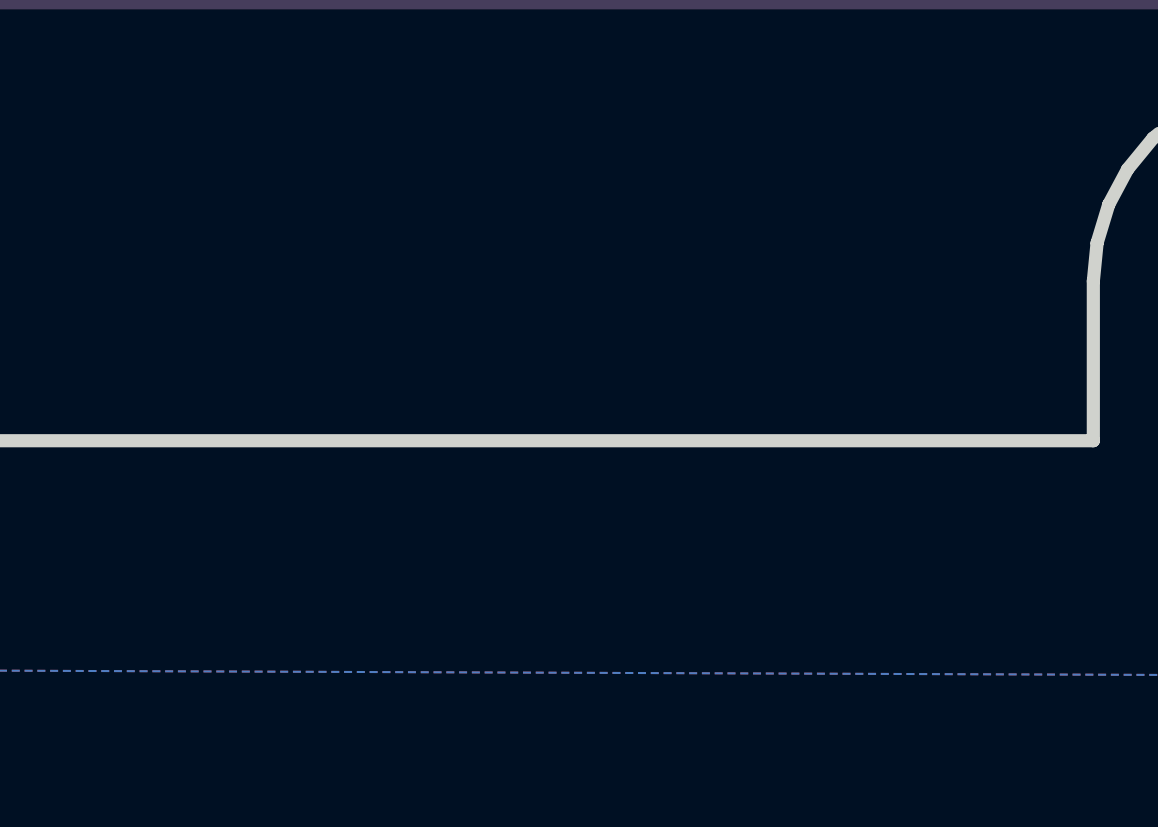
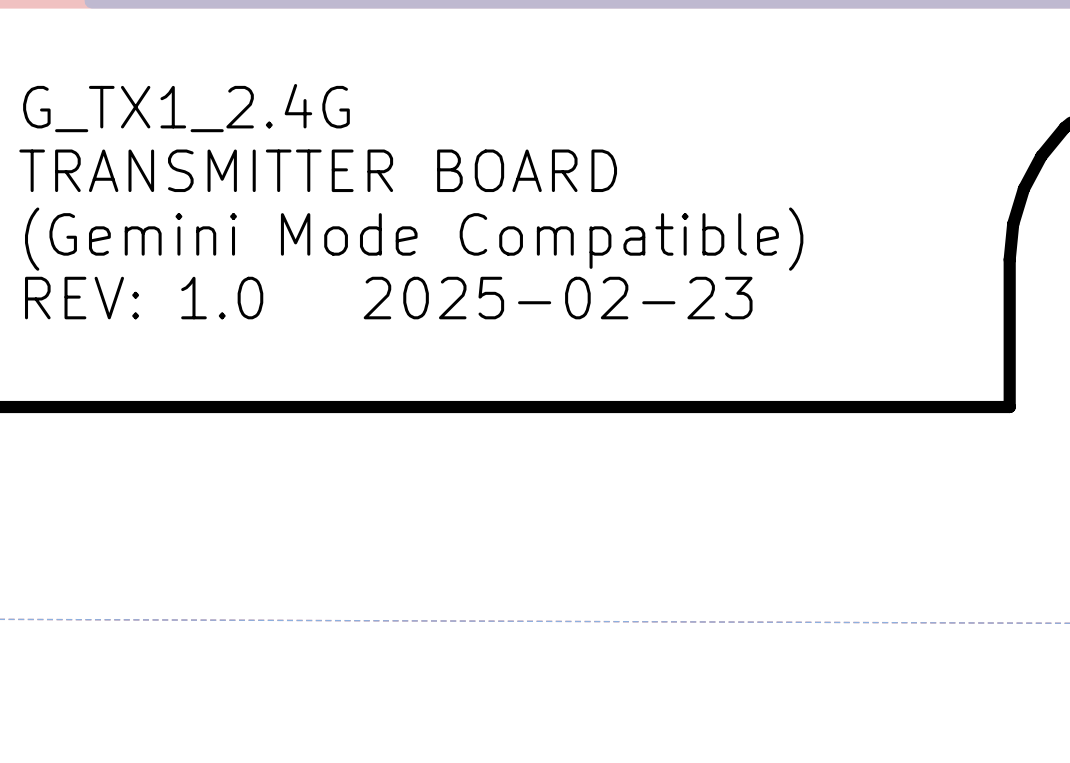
text: none -> G_TX1_2.4G (186, 108)
text: none -> TRANSMITTER BOARD (318, 170)
text: none -> (Gemini Mode Compatible) (414, 239)
text: none -> REV: 1.0 2025-02-23 (388, 298)

